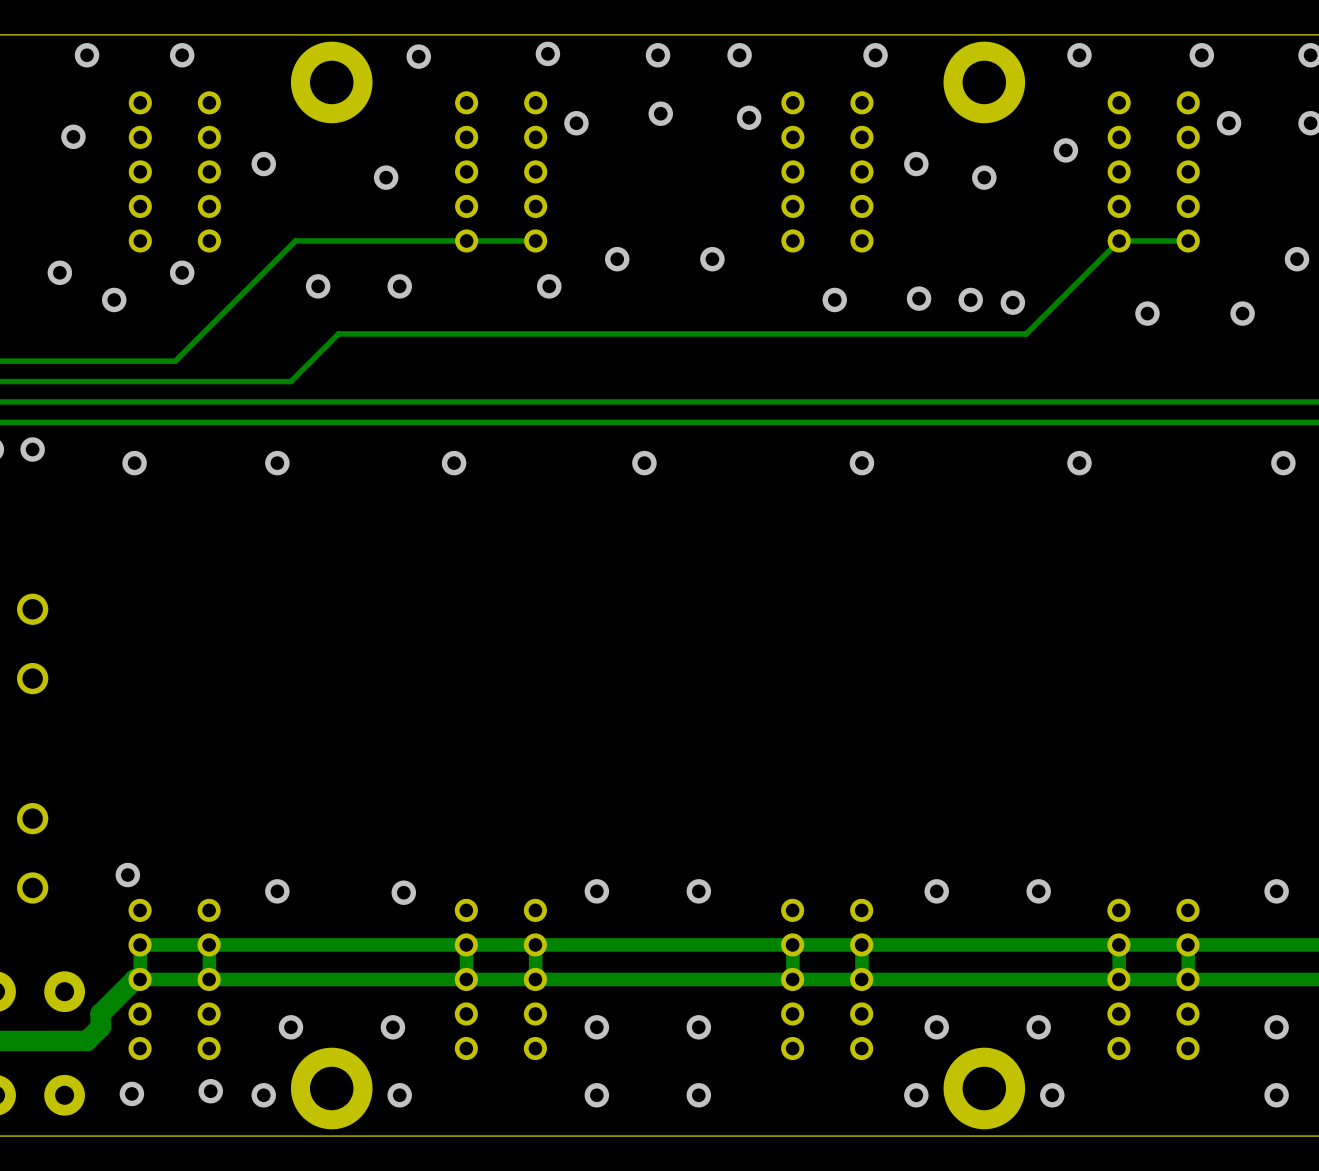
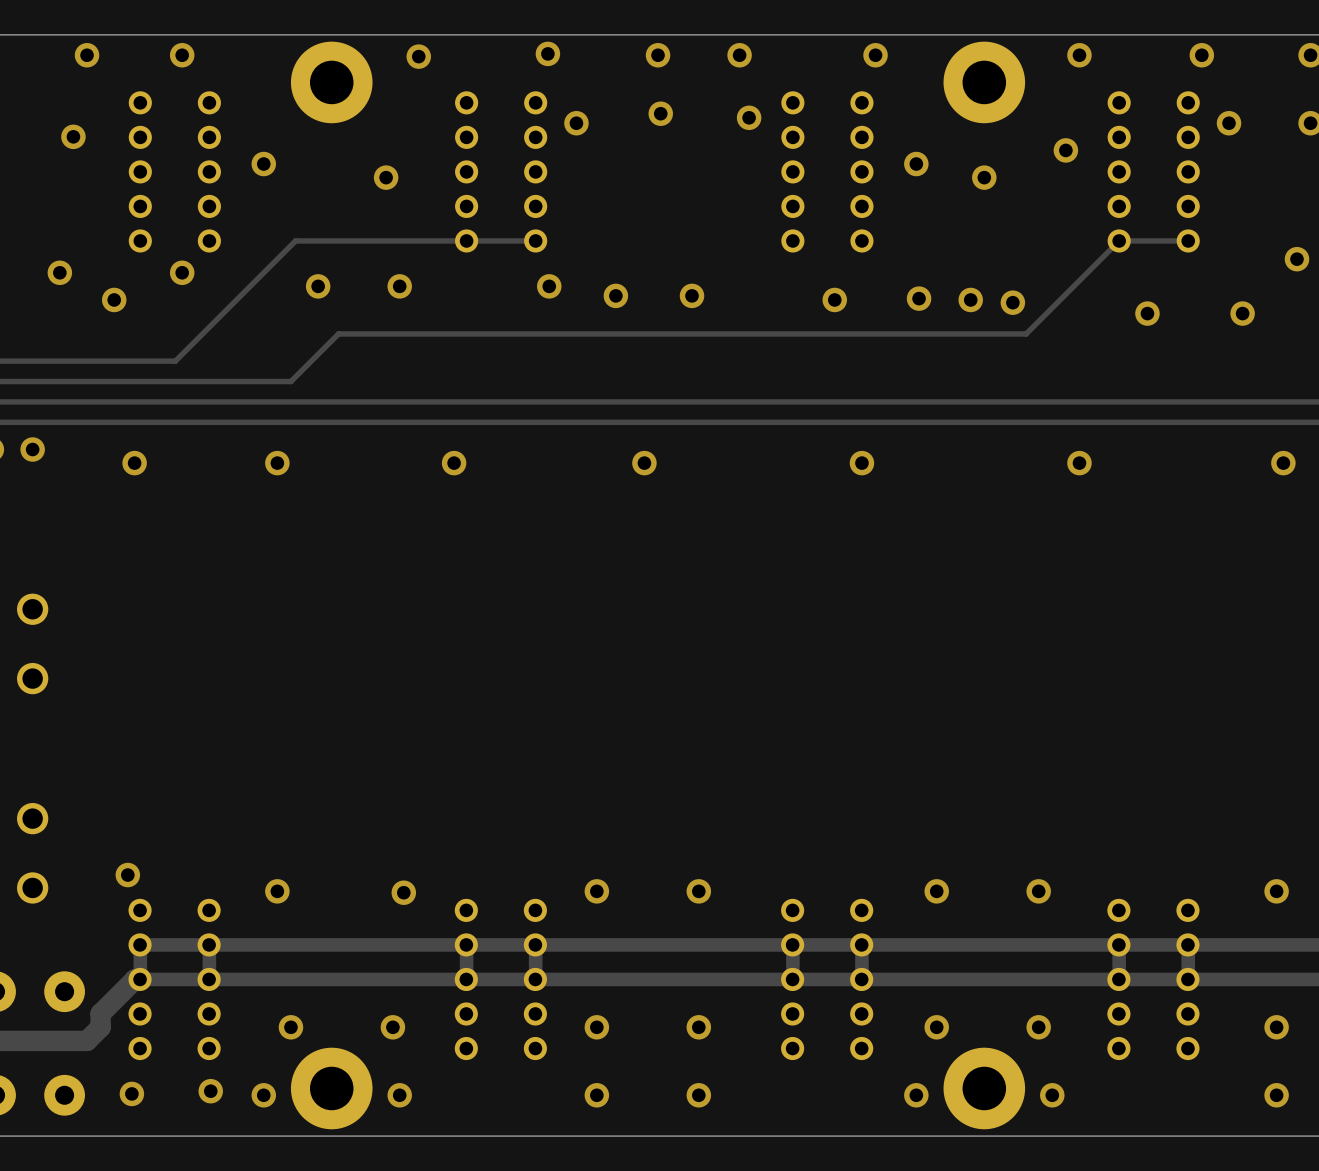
via position: (617, 259) -> (615, 295)
via: (712, 259) -> none
via: none -> (692, 295)

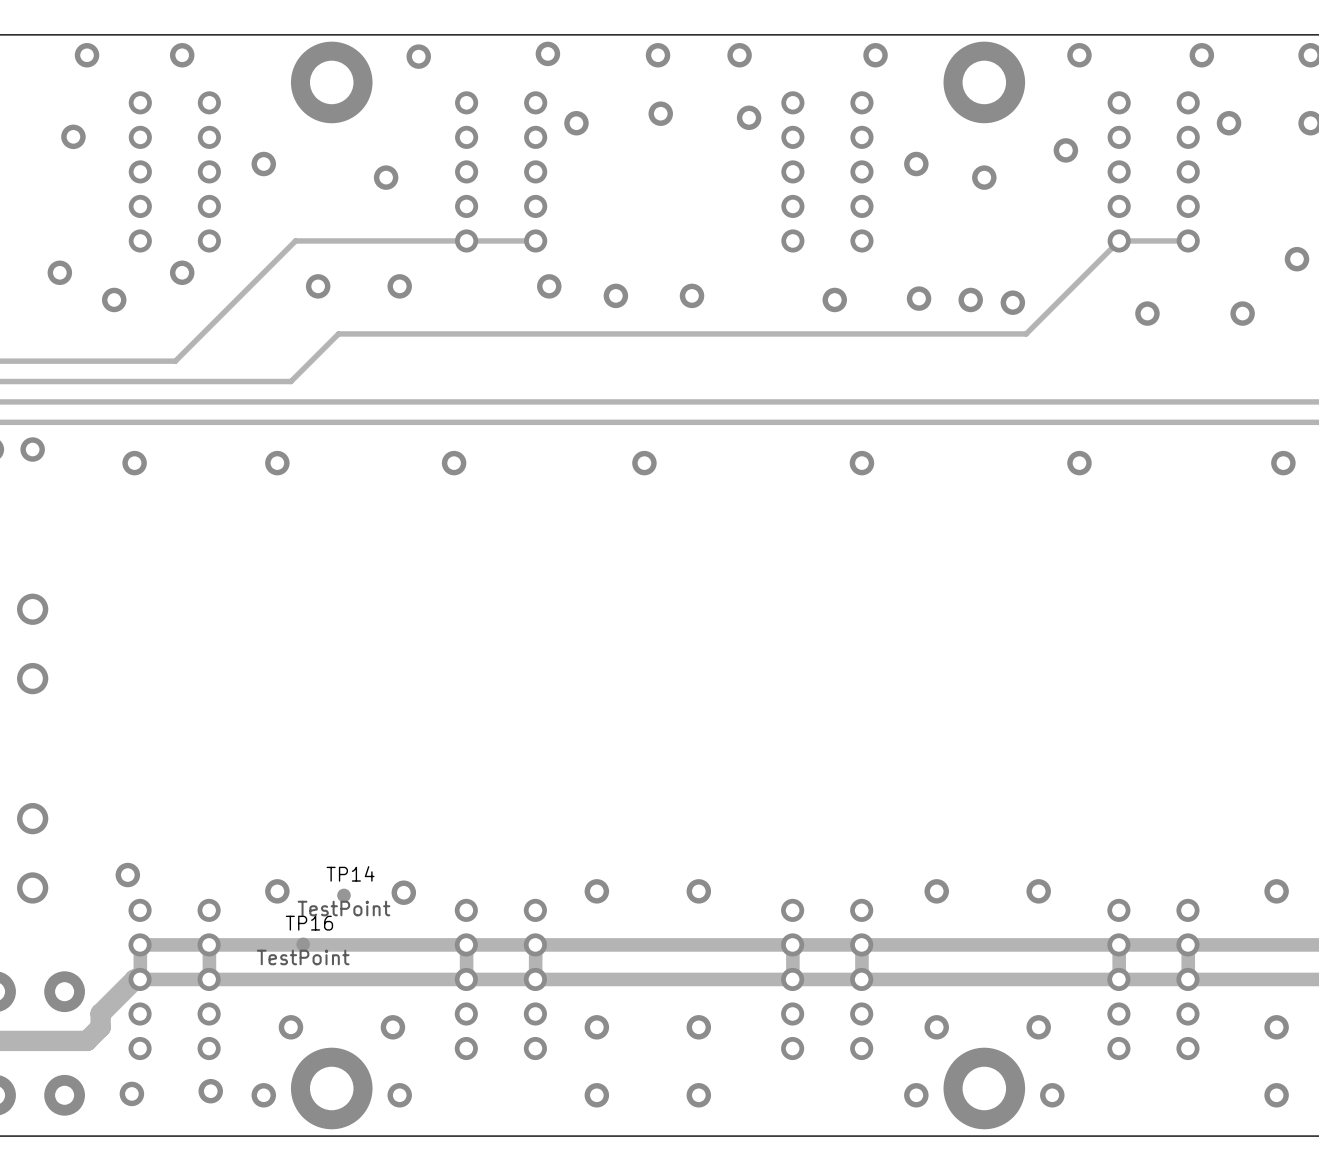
TP14: none -> TestPoint (343, 895)
TP16: none -> TestPoint (303, 944)

